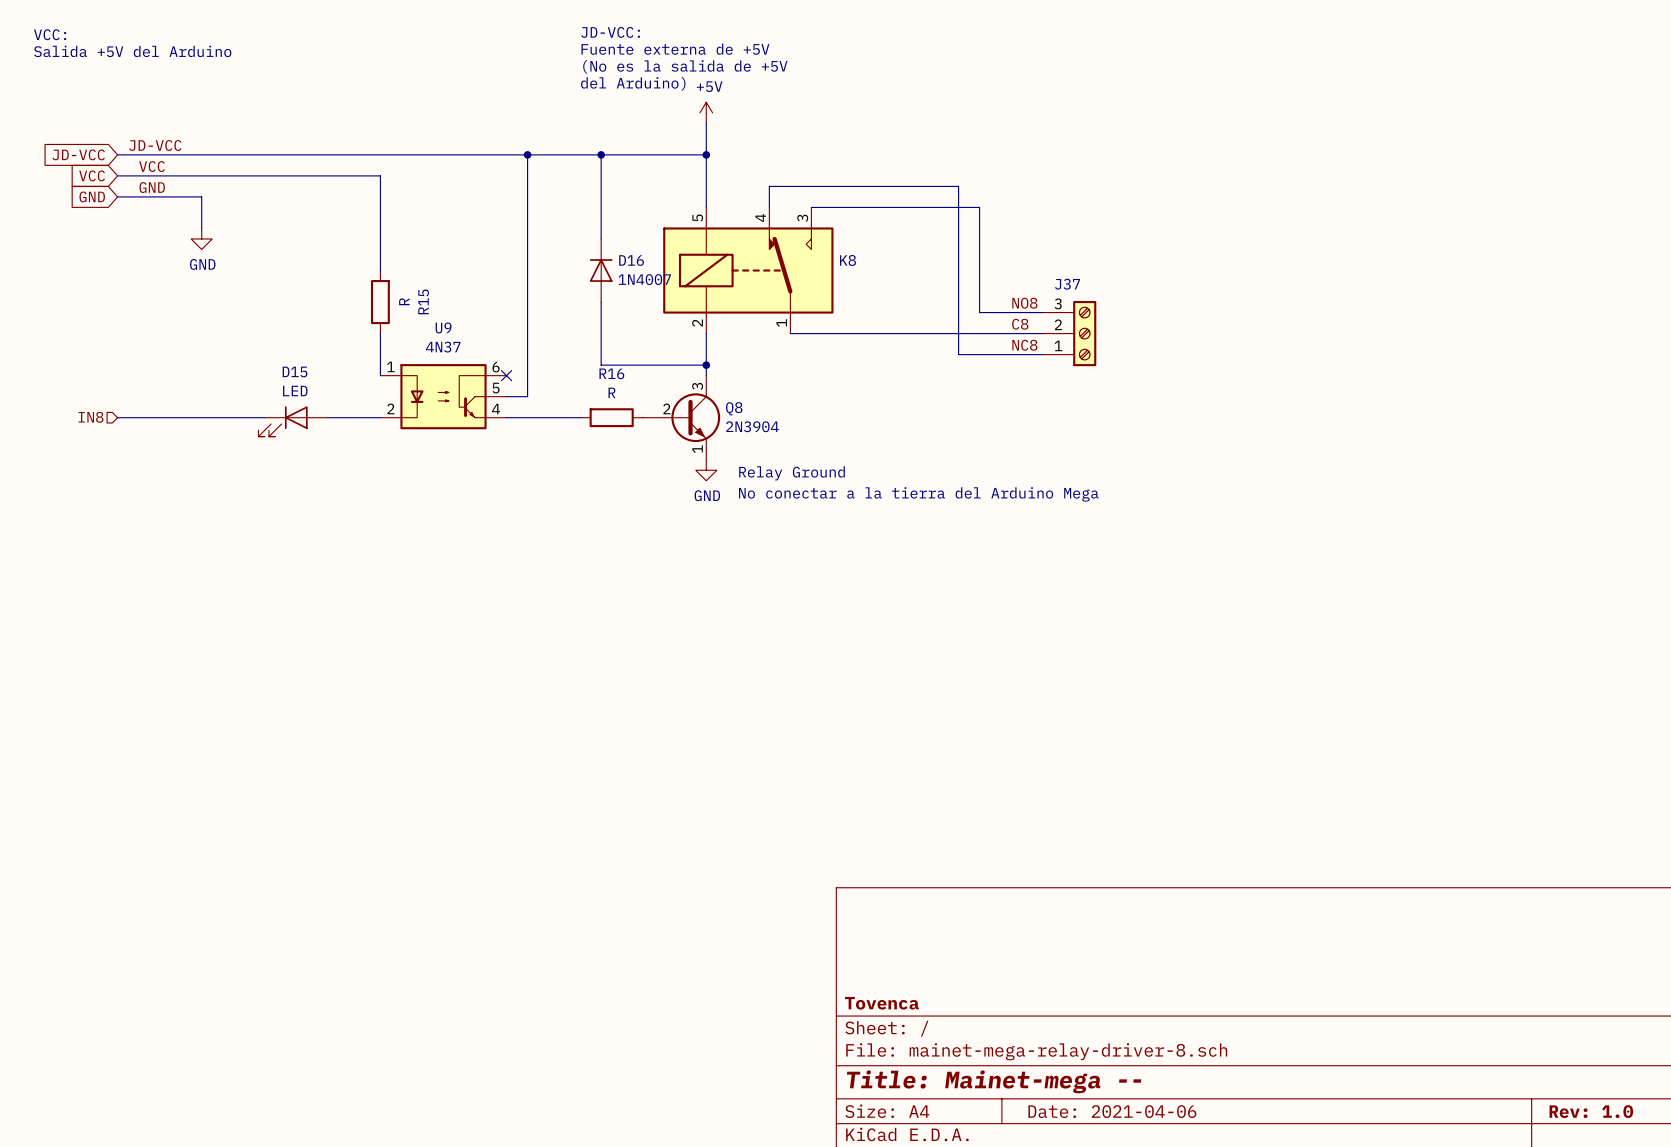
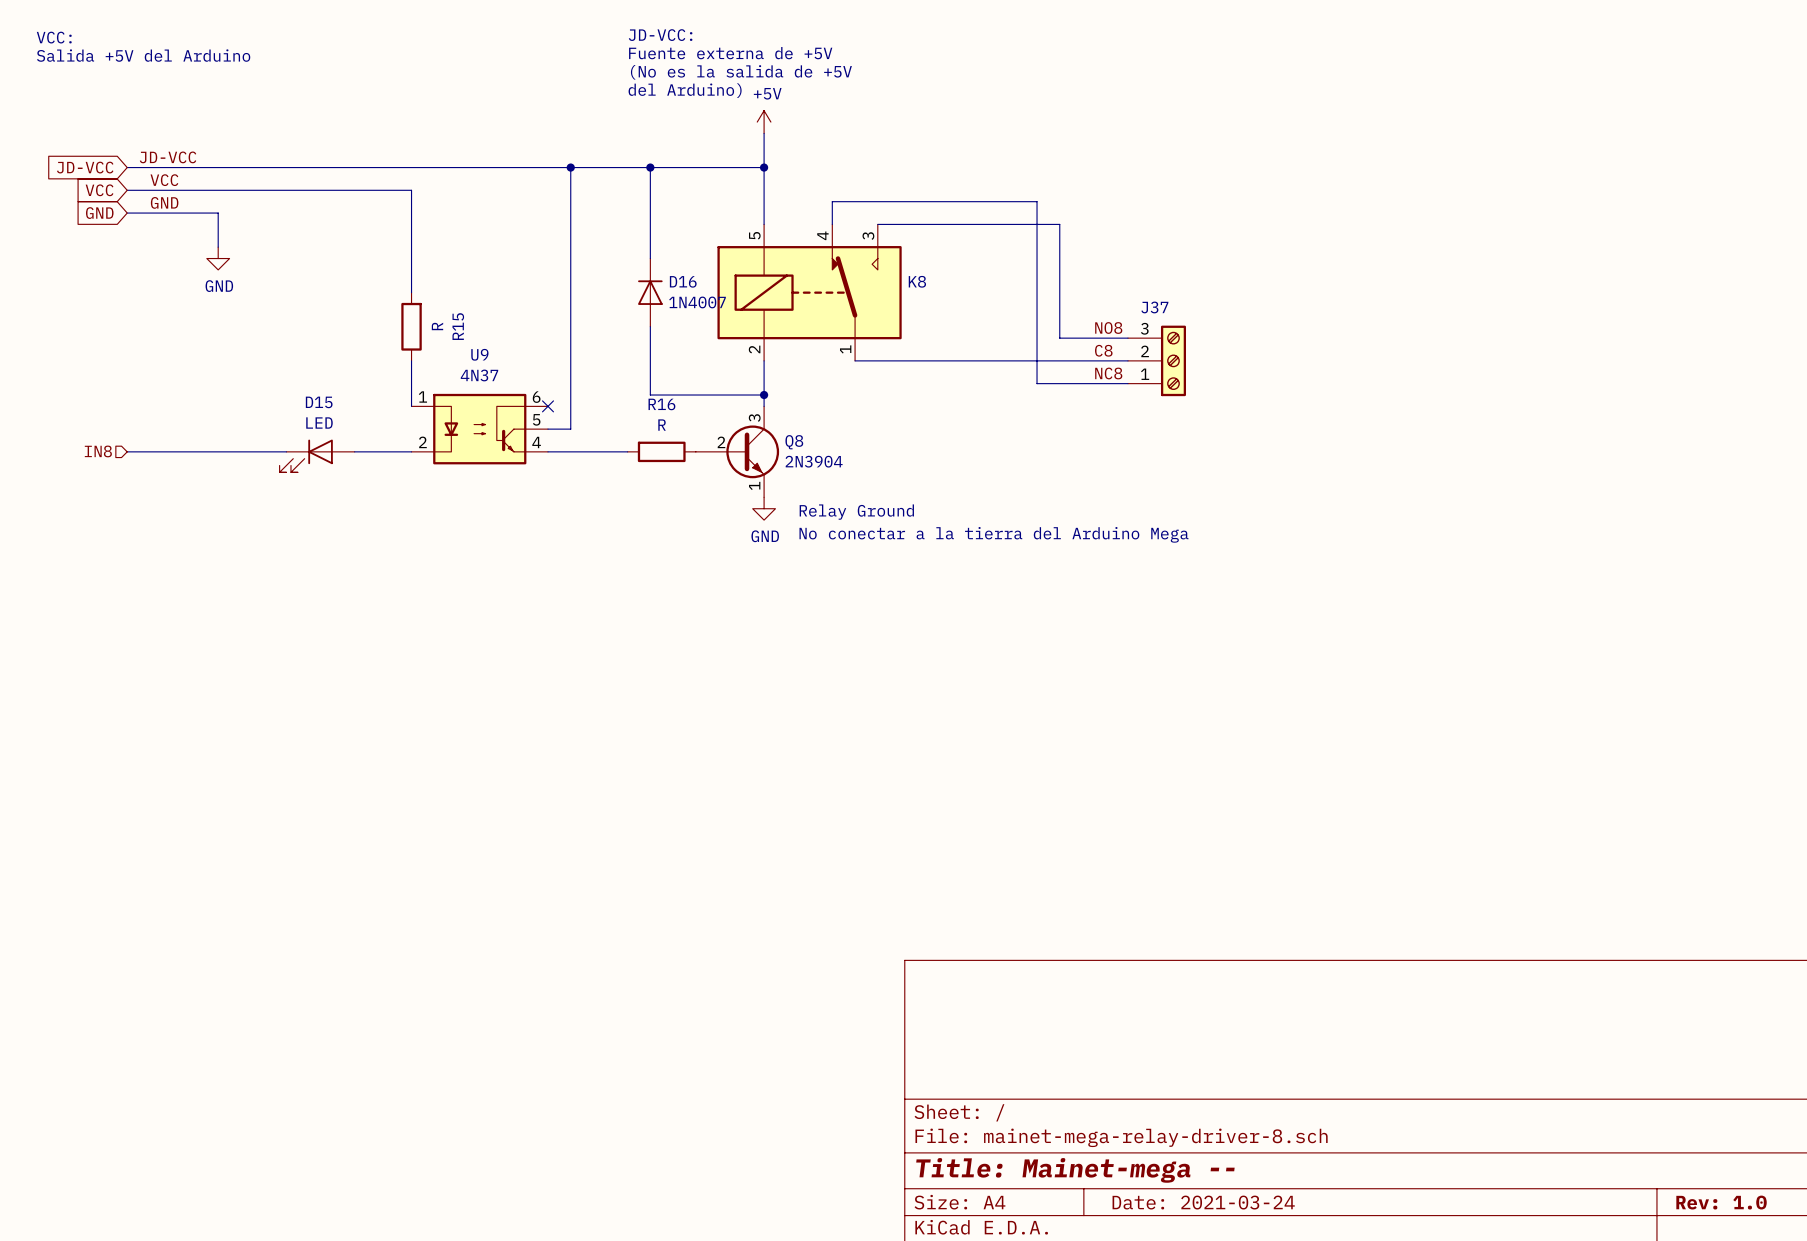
title block: Tovenca (881, 1003) -> none
title block: Date: 2021-04-06 (1112, 1111) -> Date: 2021-03-24 (1203, 1202)

